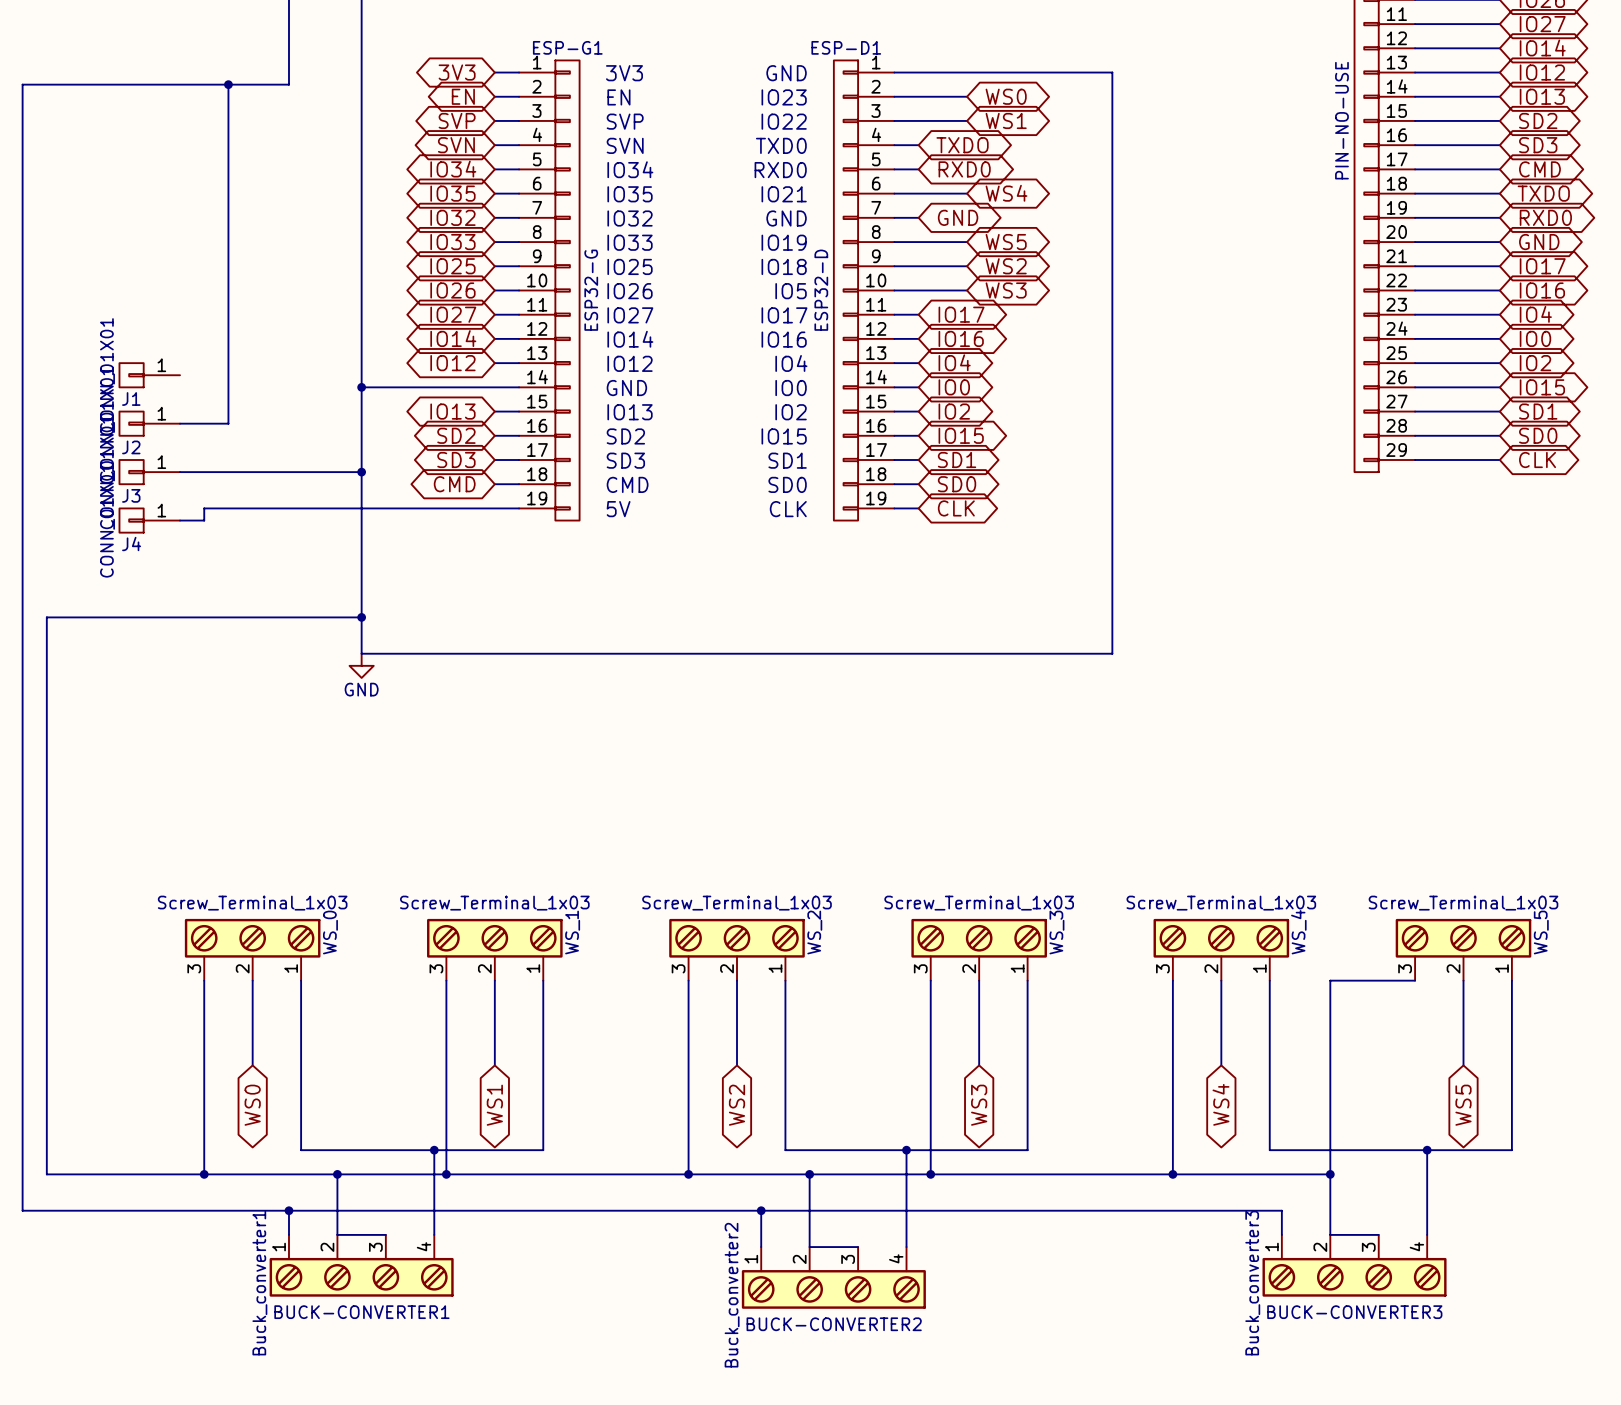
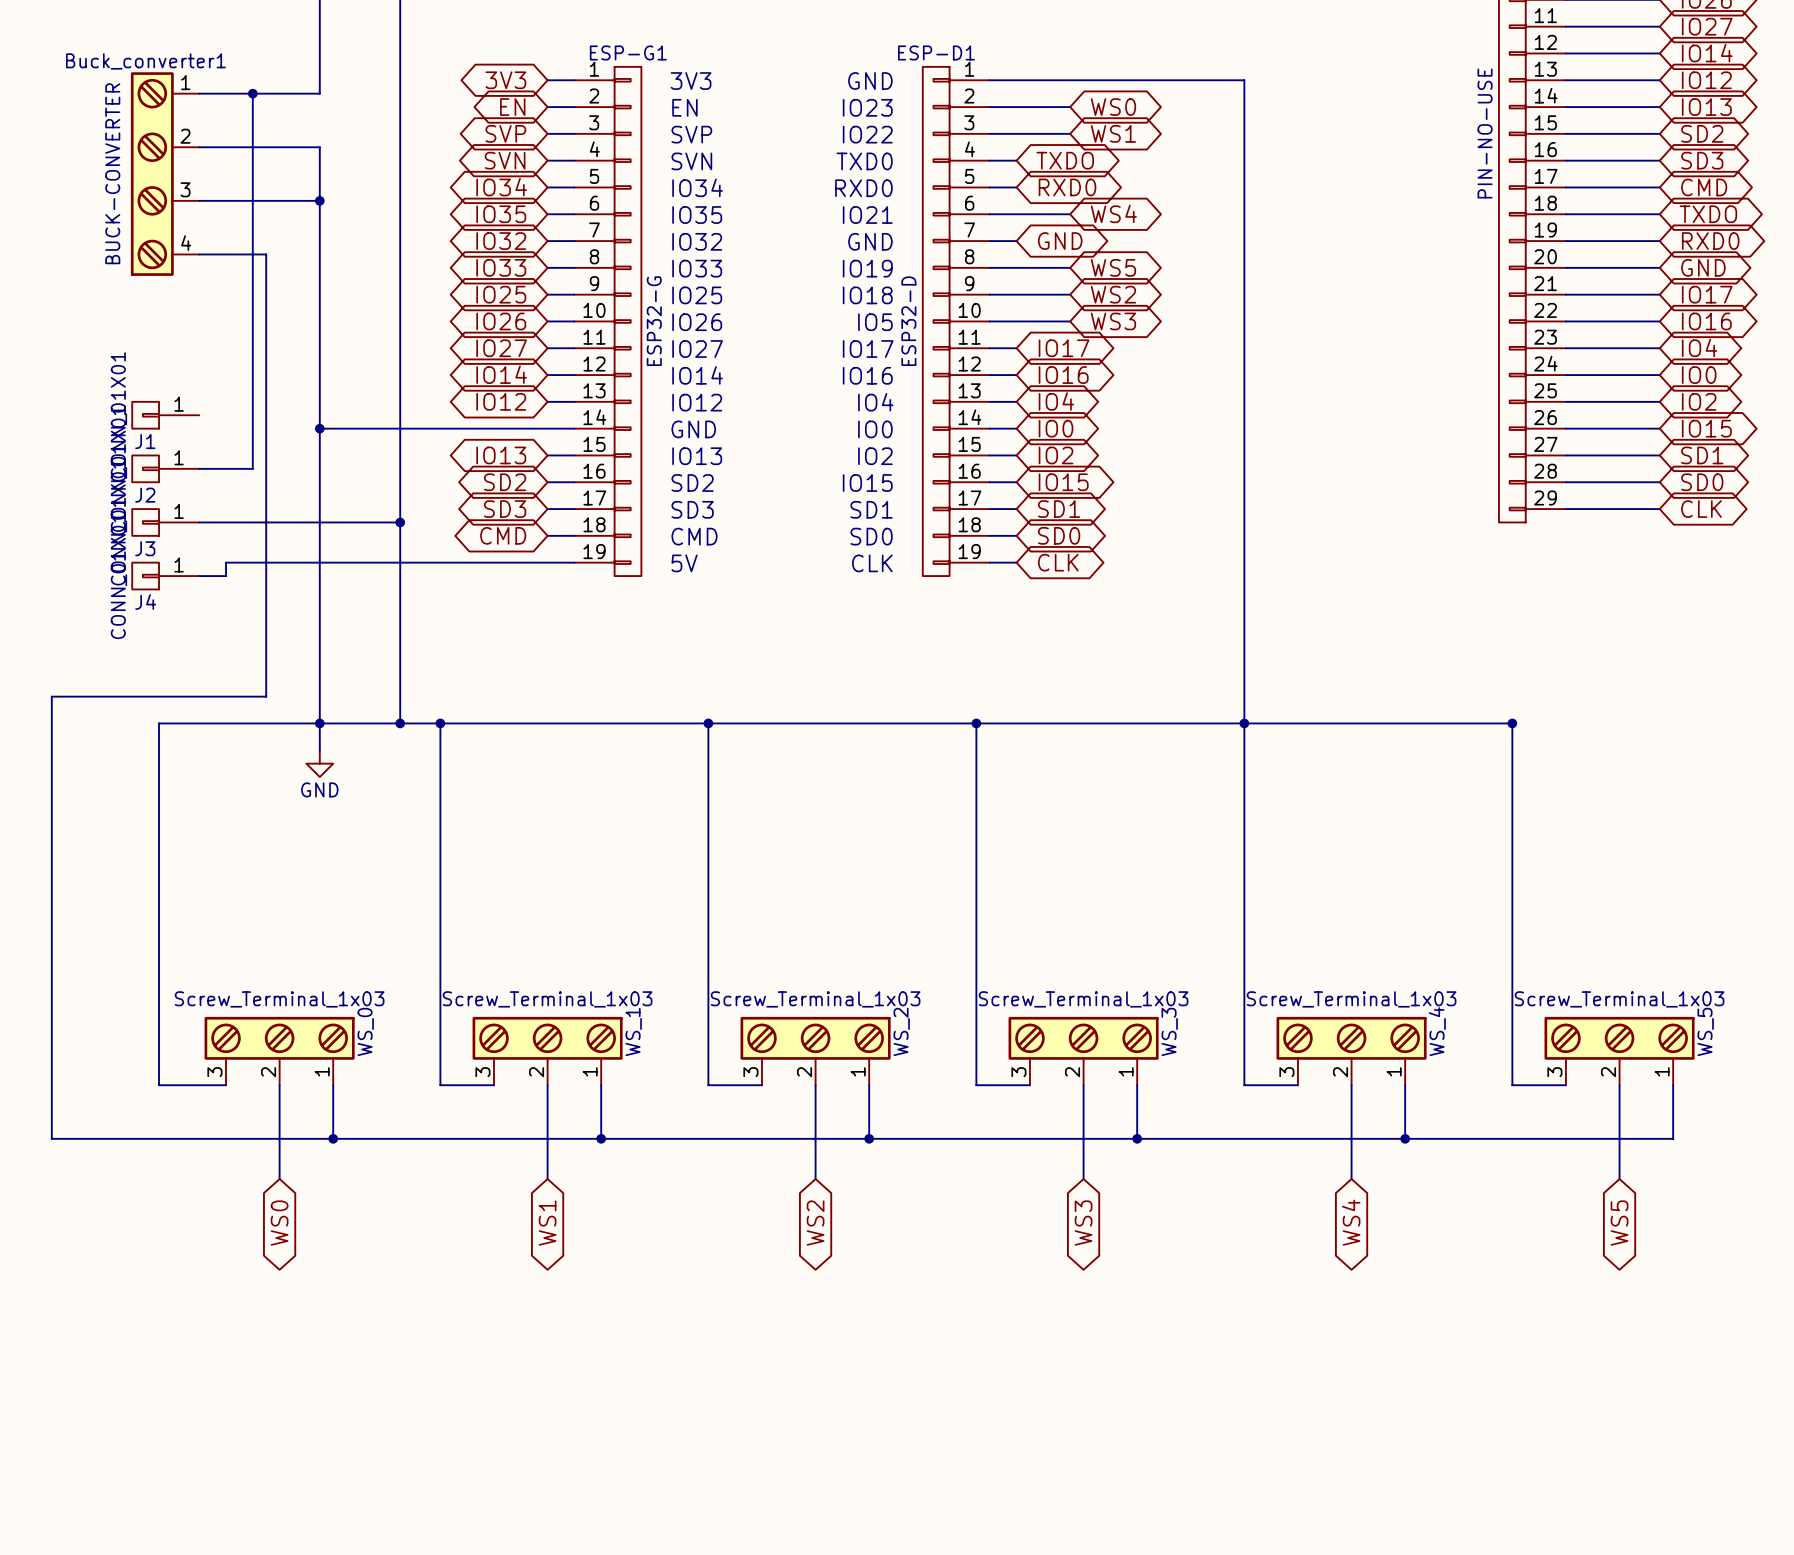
wire: (1112, 72) (1112, 653) -> (1230, 80) (1244, 80) (1244, 1085) (1297, 1085)
wire: (180, 84) (22, 84) (22, 1210) (1281, 1210) (1281, 1234) -> none
wire: none -> (199, 147) (319, 147) (319, 750)
wire: none -> (199, 200) (319, 200)
junction: none -> (319, 200)
wire: none -> (319, 428) (400, 428)
junction: none -> (319, 428)
junction: (361, 387) -> none
wire: (361, 617) (46, 617) (46, 629) -> (199, 254) (266, 254) (266, 696) (51, 696)
junction: (361, 617) -> none
junction: none -> (319, 723)
junction: none -> (400, 723)
junction: none -> (440, 723)
junction: none -> (708, 723)
junction: none -> (976, 723)
junction: none -> (1244, 723)
junction: none -> (1512, 723)
power symbol position: GND (361, 665) -> GND (319, 763)
wire: (204, 980) (204, 1174) -> (226, 1085) (159, 1085) (159, 723) (400, 723)
wire: (446, 980) (446, 1174) -> (494, 1085) (440, 1085) (440, 723)
wire: (688, 980) (688, 1174) -> (761, 1085) (708, 1085) (708, 723)
wire: (930, 980) (930, 1174) -> (1029, 1085) (976, 1085) (976, 723)
wire: (1172, 980) (1172, 1174) -> none
wire: (1366, 980) (1330, 980) (1330, 1234) (1378, 1234) -> (1512, 1085) (1512, 723) (1230, 723)
wire: (46, 1029) (46, 1174) (1330, 1174) -> (51, 1138) (1673, 1138)
wire: (301, 1029) (301, 1150) (543, 1150) (543, 1029) -> none
junction: none -> (333, 1138)
junction: none -> (601, 1138)
wire: (785, 1029) (785, 1150) (1027, 1150) (1027, 1029) -> none
junction: none -> (869, 1138)
junction: none -> (1137, 1138)
wire: (1269, 1029) (1269, 1150) (1511, 1150) (1511, 1029) -> none
junction: none -> (1405, 1138)
wire: (434, 1150) (434, 1234) -> none
junction: (434, 1150) -> none
wire: (906, 1150) (906, 1247) -> none
junction: (906, 1150) -> none
wire: (1427, 1150) (1427, 1234) -> none
junction: (1427, 1150) -> none
junction: (204, 1174) -> none
wire: (337, 1174) (337, 1234) (385, 1234) -> none
junction: (337, 1174) -> none
junction: (446, 1174) -> none
junction: (688, 1174) -> none
wire: (809, 1174) (809, 1247) (858, 1247) -> none
junction: (809, 1174) -> none
junction: (930, 1174) -> none
junction: (1172, 1174) -> none
junction: (1330, 1174) -> none
wire: (288, 1210) (288, 1234) -> none
junction: (288, 1210) -> none
wire: (761, 1210) (761, 1247) -> none
junction: (761, 1210) -> none
Buck_converter1 position: (361, 1265) -> (165, 174)
Buck_converter3: BUCK-CONVERTER3 (1354, 1265) -> none
Buck_converter1 rotation: 0° (361, 1277) -> 90° clockwise (152, 174)
Buck_converter2: BUCK-CONVERTER2 (833, 1277) -> none
Buck_converter1 value: BUCK-CONVERTER1 (361, 1312) -> BUCK-CONVERTER (112, 173)

